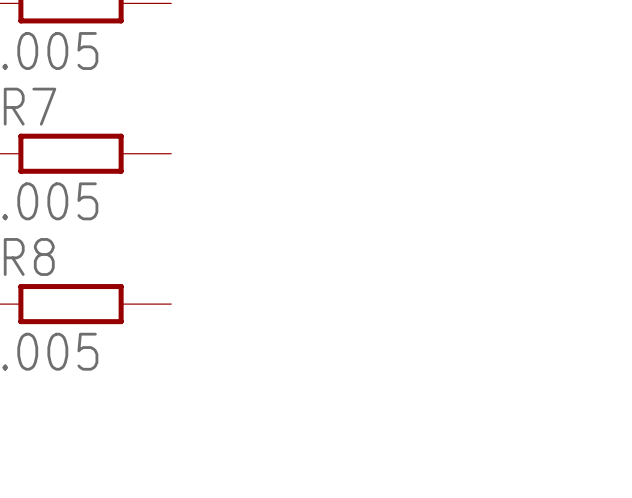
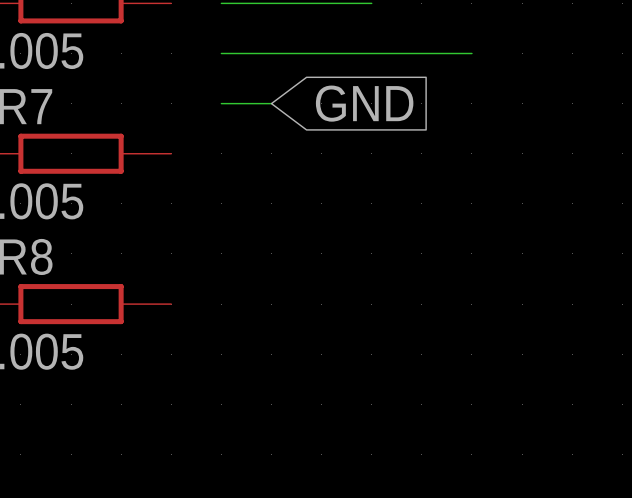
wire: none -> (221, 3) (371, 3)
wire: none -> (221, 53) (471, 53)
wire: none -> (221, 103) (271, 103)
global label: none -> GND (364, 103)

